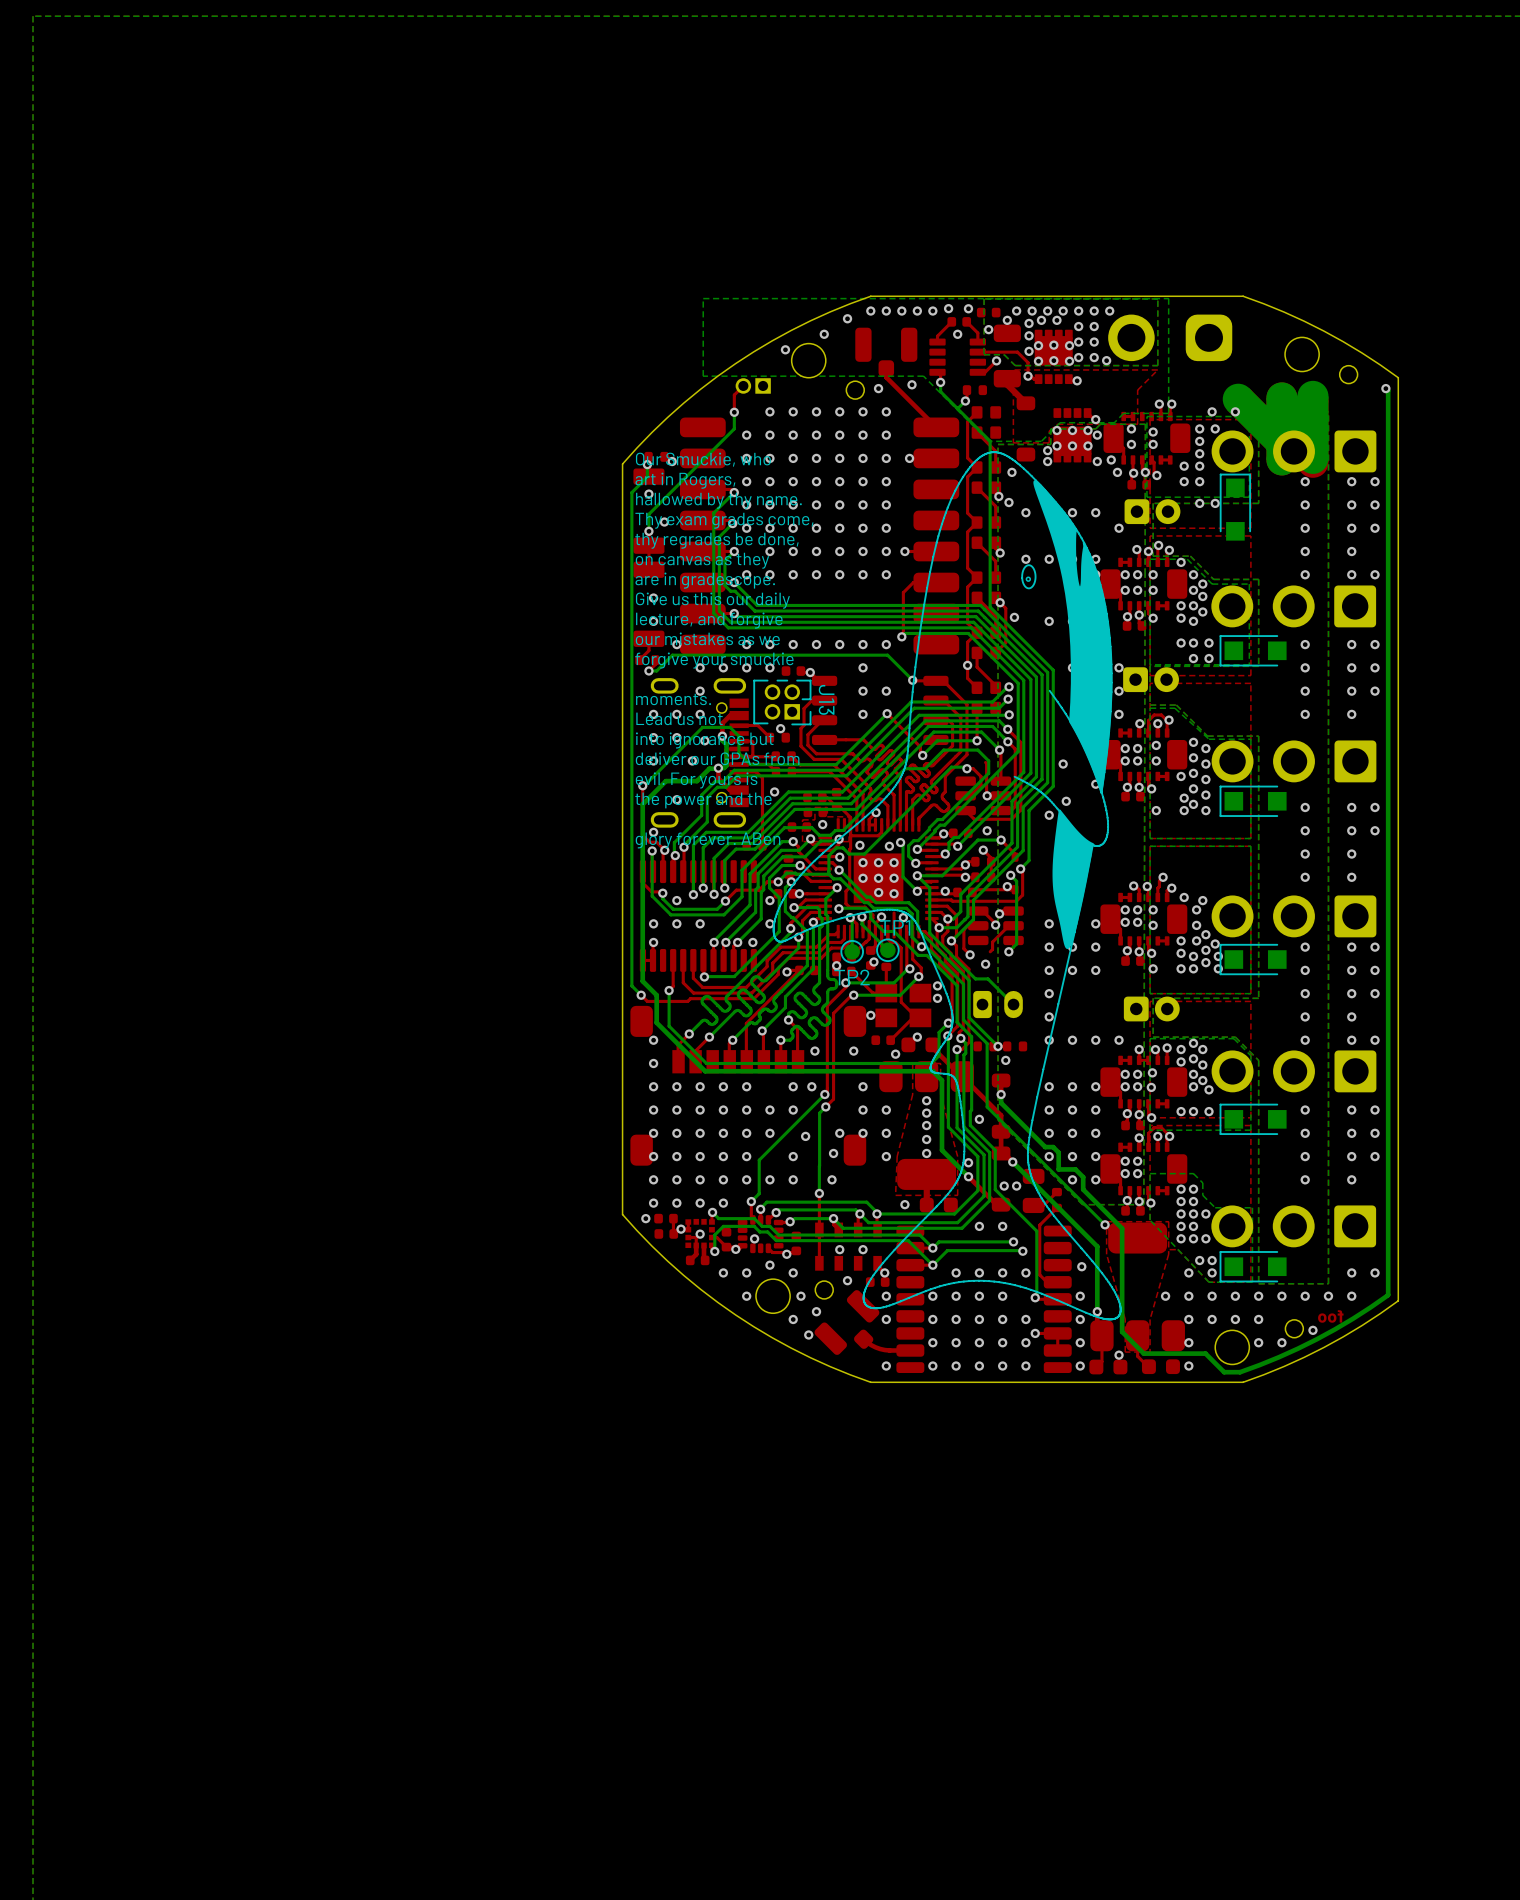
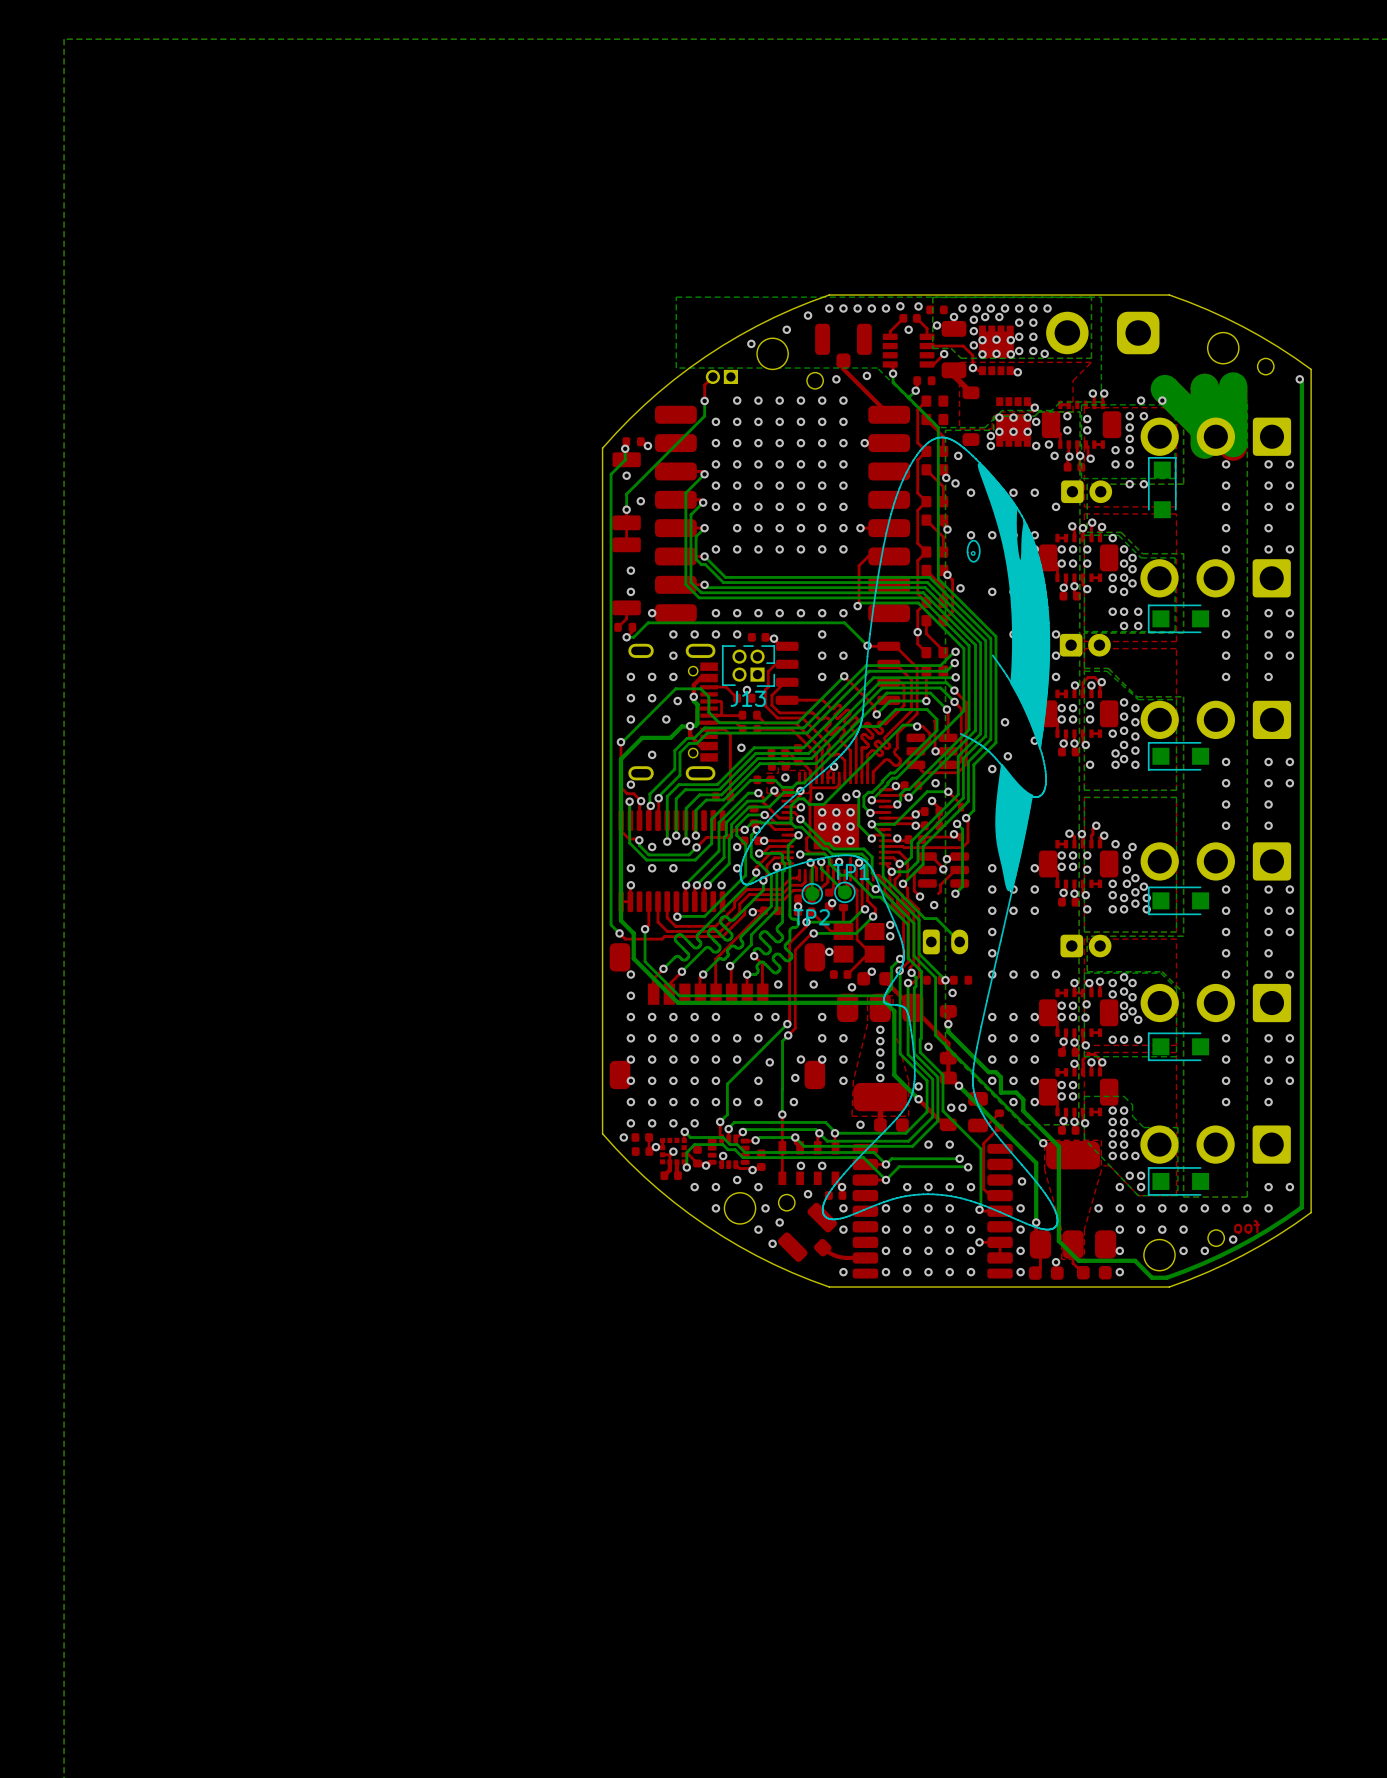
text: Our Smuckie, who (703, 459) -> none
text: art in Rogers, (685, 480) -> none
text: hallowed by thy name. (718, 500) -> none
text: Thy exam grades come, (724, 520) -> none
text: thy regrades be done, (716, 540) -> none
text: on canvas as they (702, 560) -> none
text: are in gradescope. (705, 580) -> none
text: Give us this our daily (712, 600) -> none
text: lecture, and forgive (709, 620) -> none
text: our mistakes as we (707, 638) -> none
text: forgive your smuckie (714, 660) -> none
text: moments. (673, 699) -> none
J13 name rotation: 0° (826, 699) -> 90° counterclockwise (748, 698)
J13 name position: J13 (826, 699) -> J13 (748, 698)
text: Lead us not (679, 718) -> none
text: into ignorance but (704, 740) -> none
text: deliver our GPAs from (717, 758) -> none
text: evil. For yours is (696, 780) -> none
text: the power and the (703, 800) -> none
text: glory forever. ABen (708, 840) -> none

